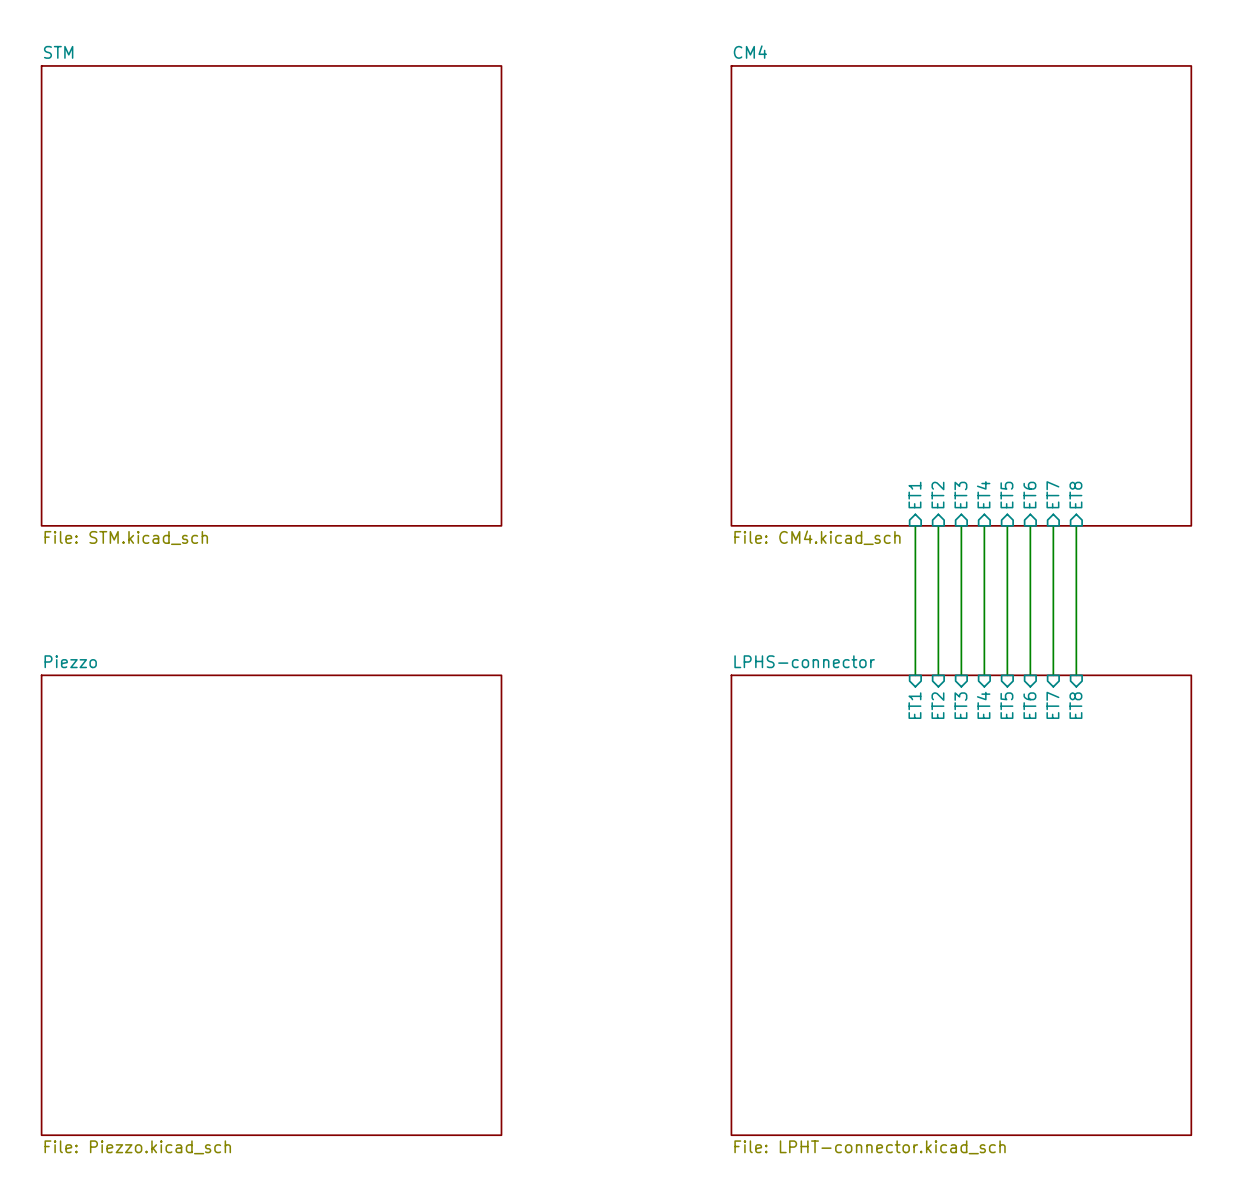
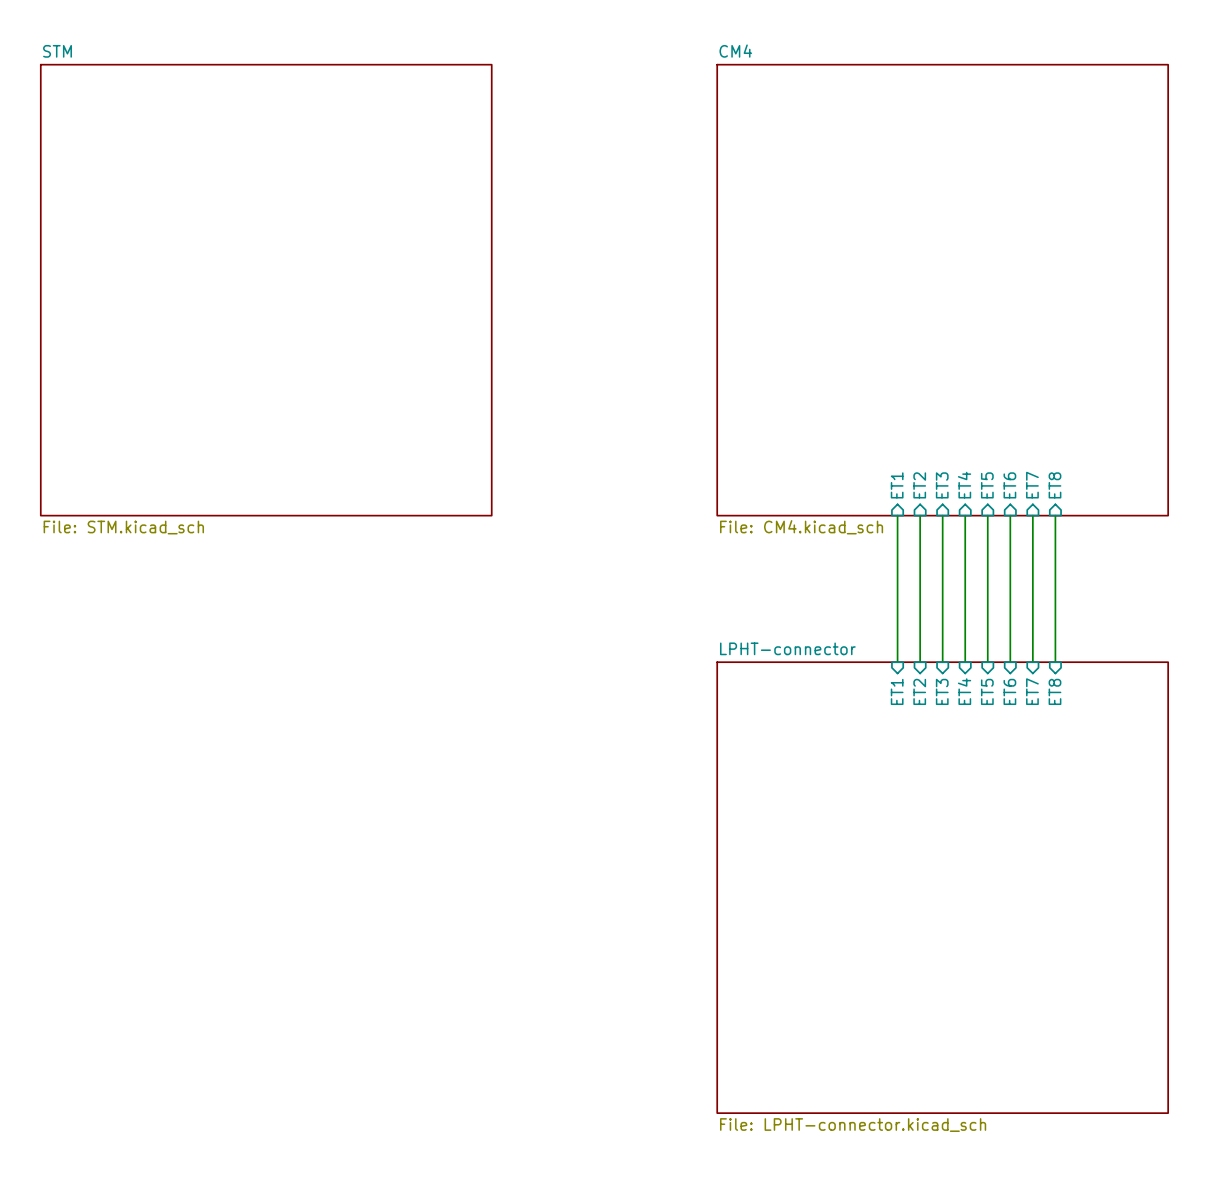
sheet LPHS-connector name: LPHS-connector (804, 661) -> LPHT-connector (787, 648)
sheet Piezzo: File: Piezzo.kicad_sch (271, 905) -> none

